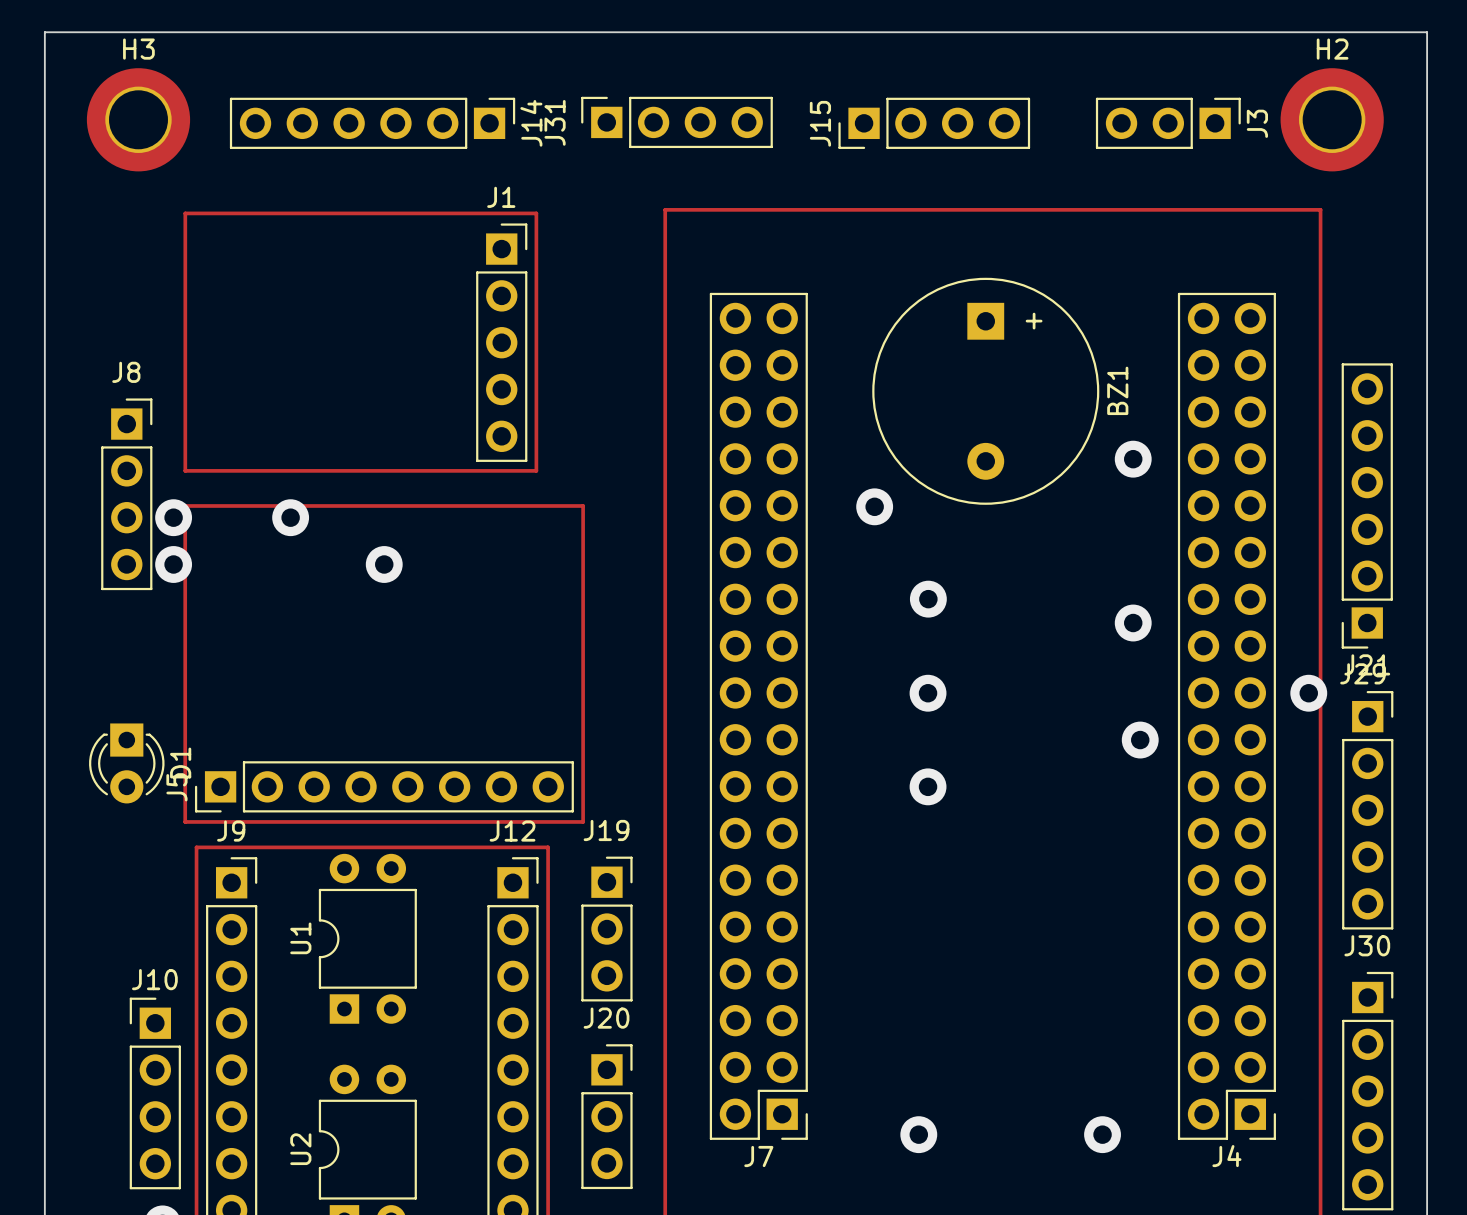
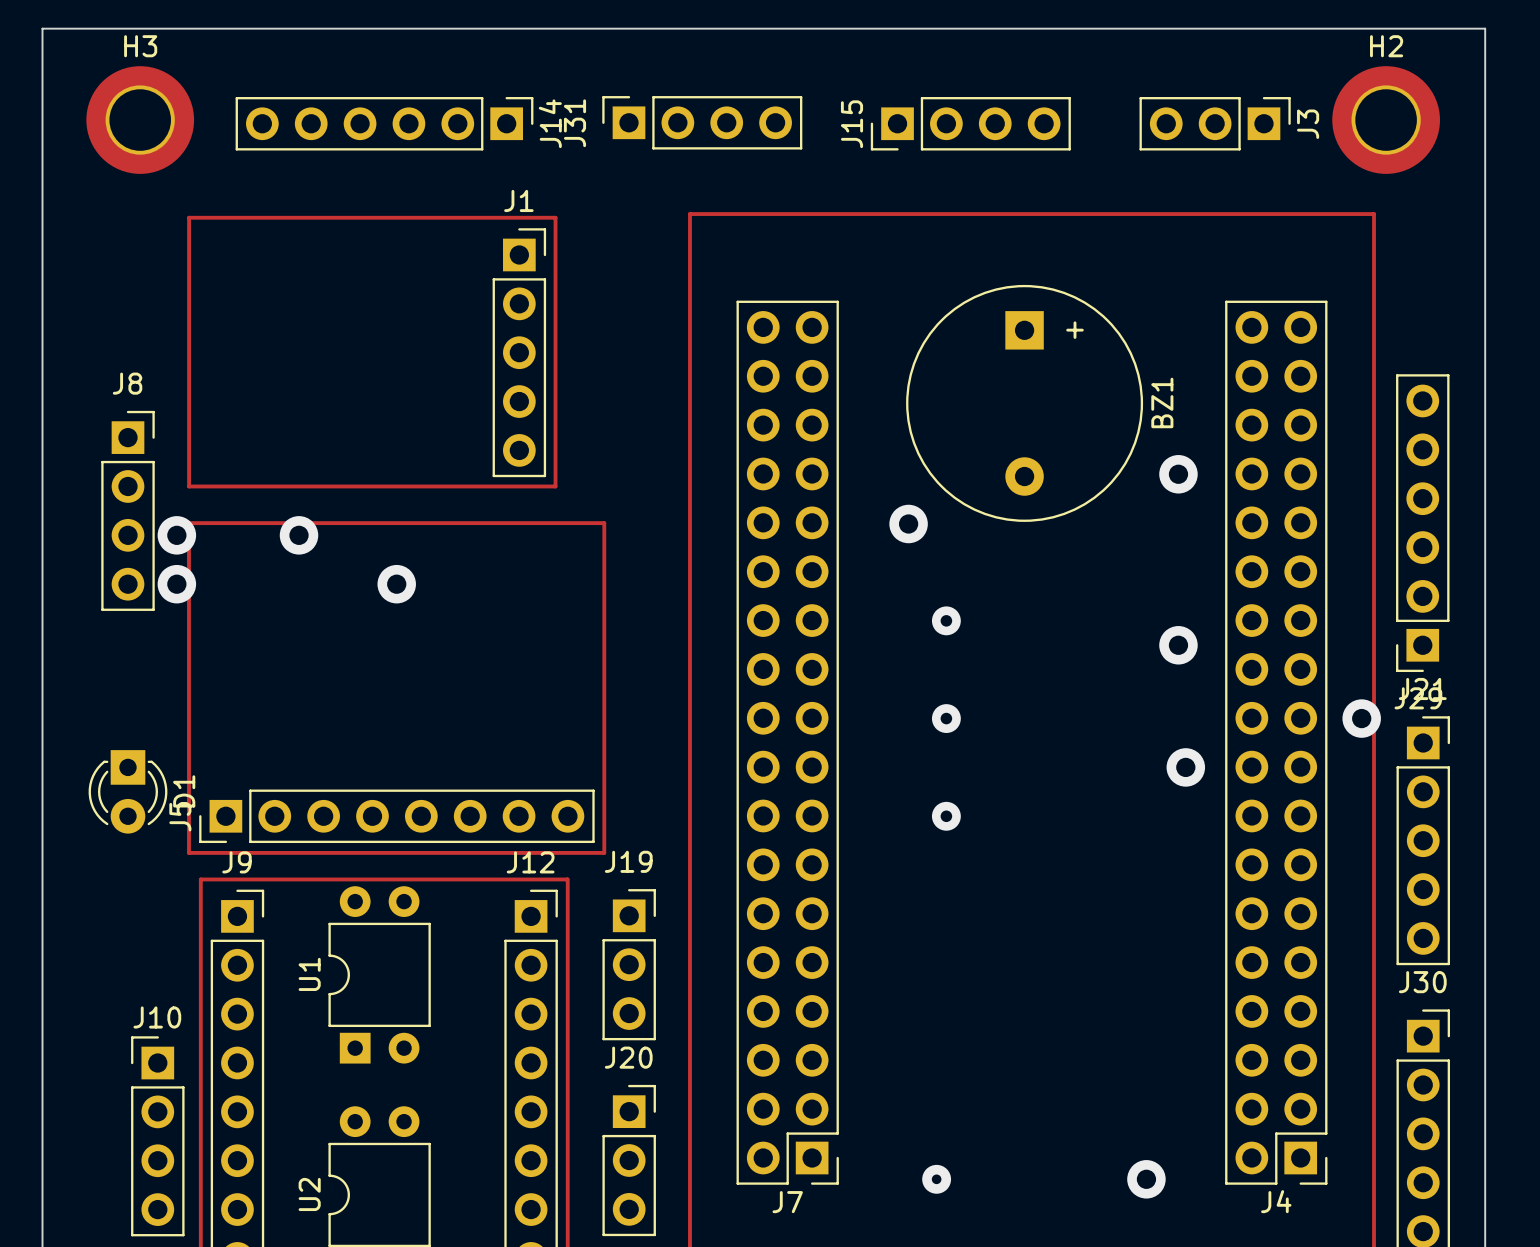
via size: [909, 580, 947, 618] -> [931, 606, 961, 636]
via size: [909, 674, 947, 712] -> [931, 704, 961, 733]
via size: [909, 768, 947, 806] -> [931, 801, 961, 831]
via size: [900, 1116, 938, 1154] -> [922, 1164, 952, 1194]

